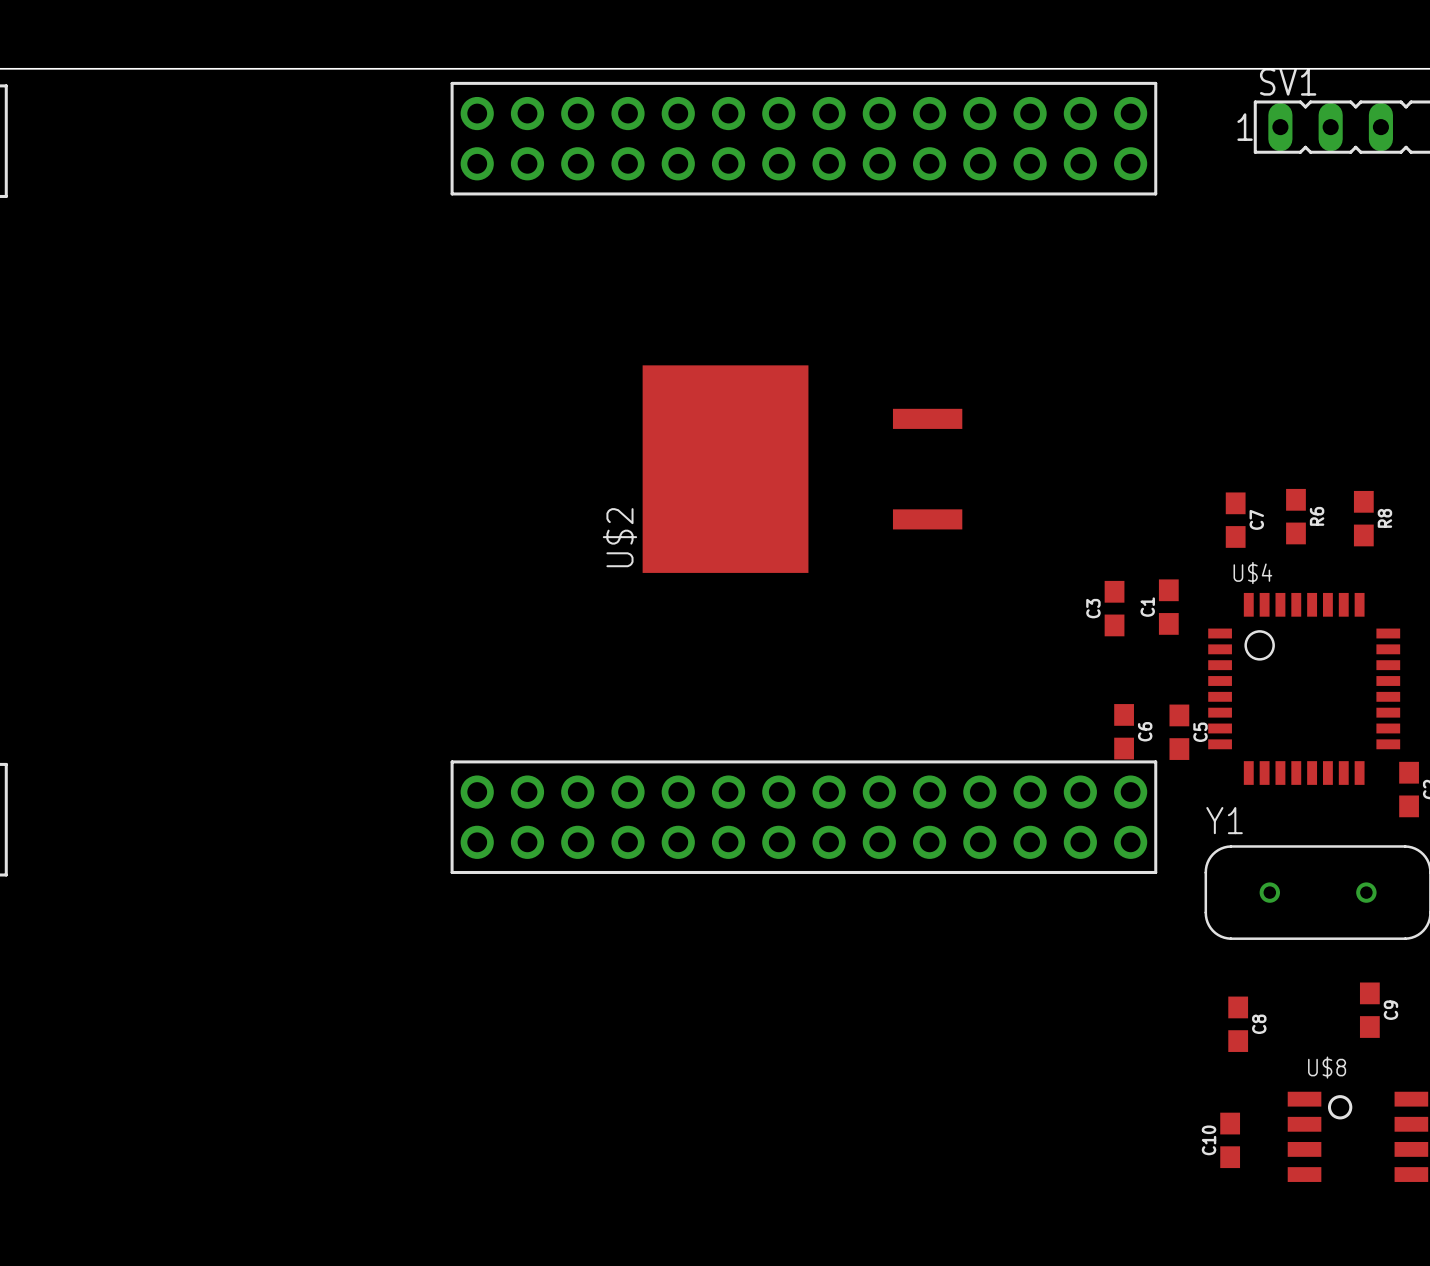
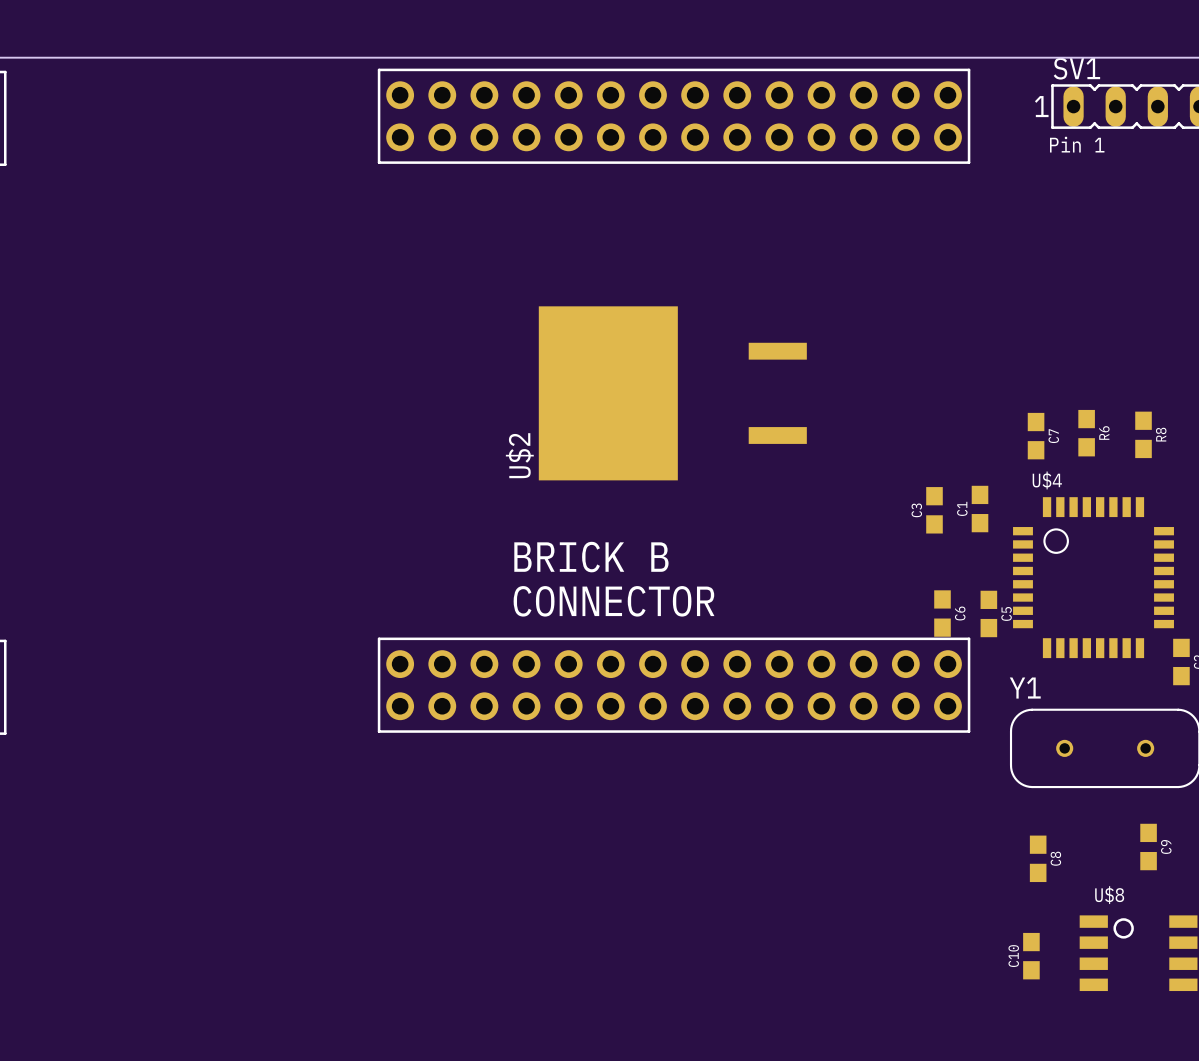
text: none -> Pin 1 (1077, 144)
text: none -> BRICK B (591, 557)
text: none -> CONNECTOR (614, 601)

